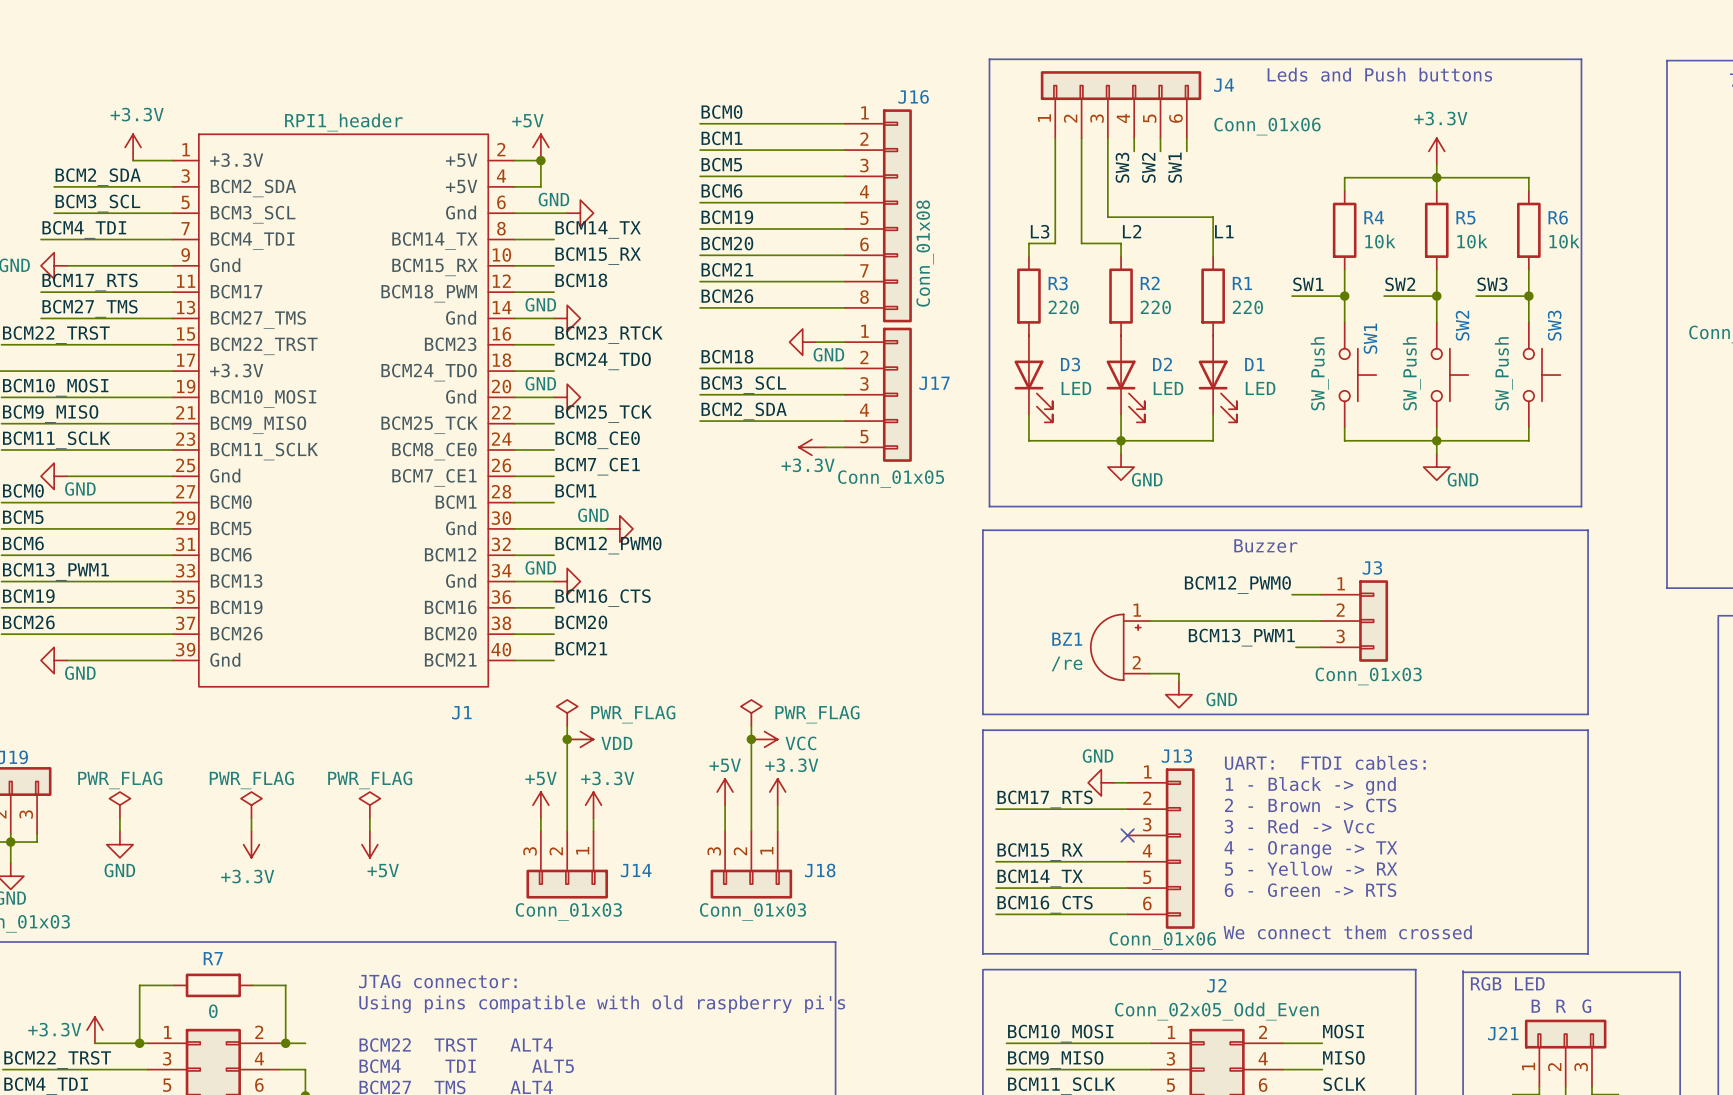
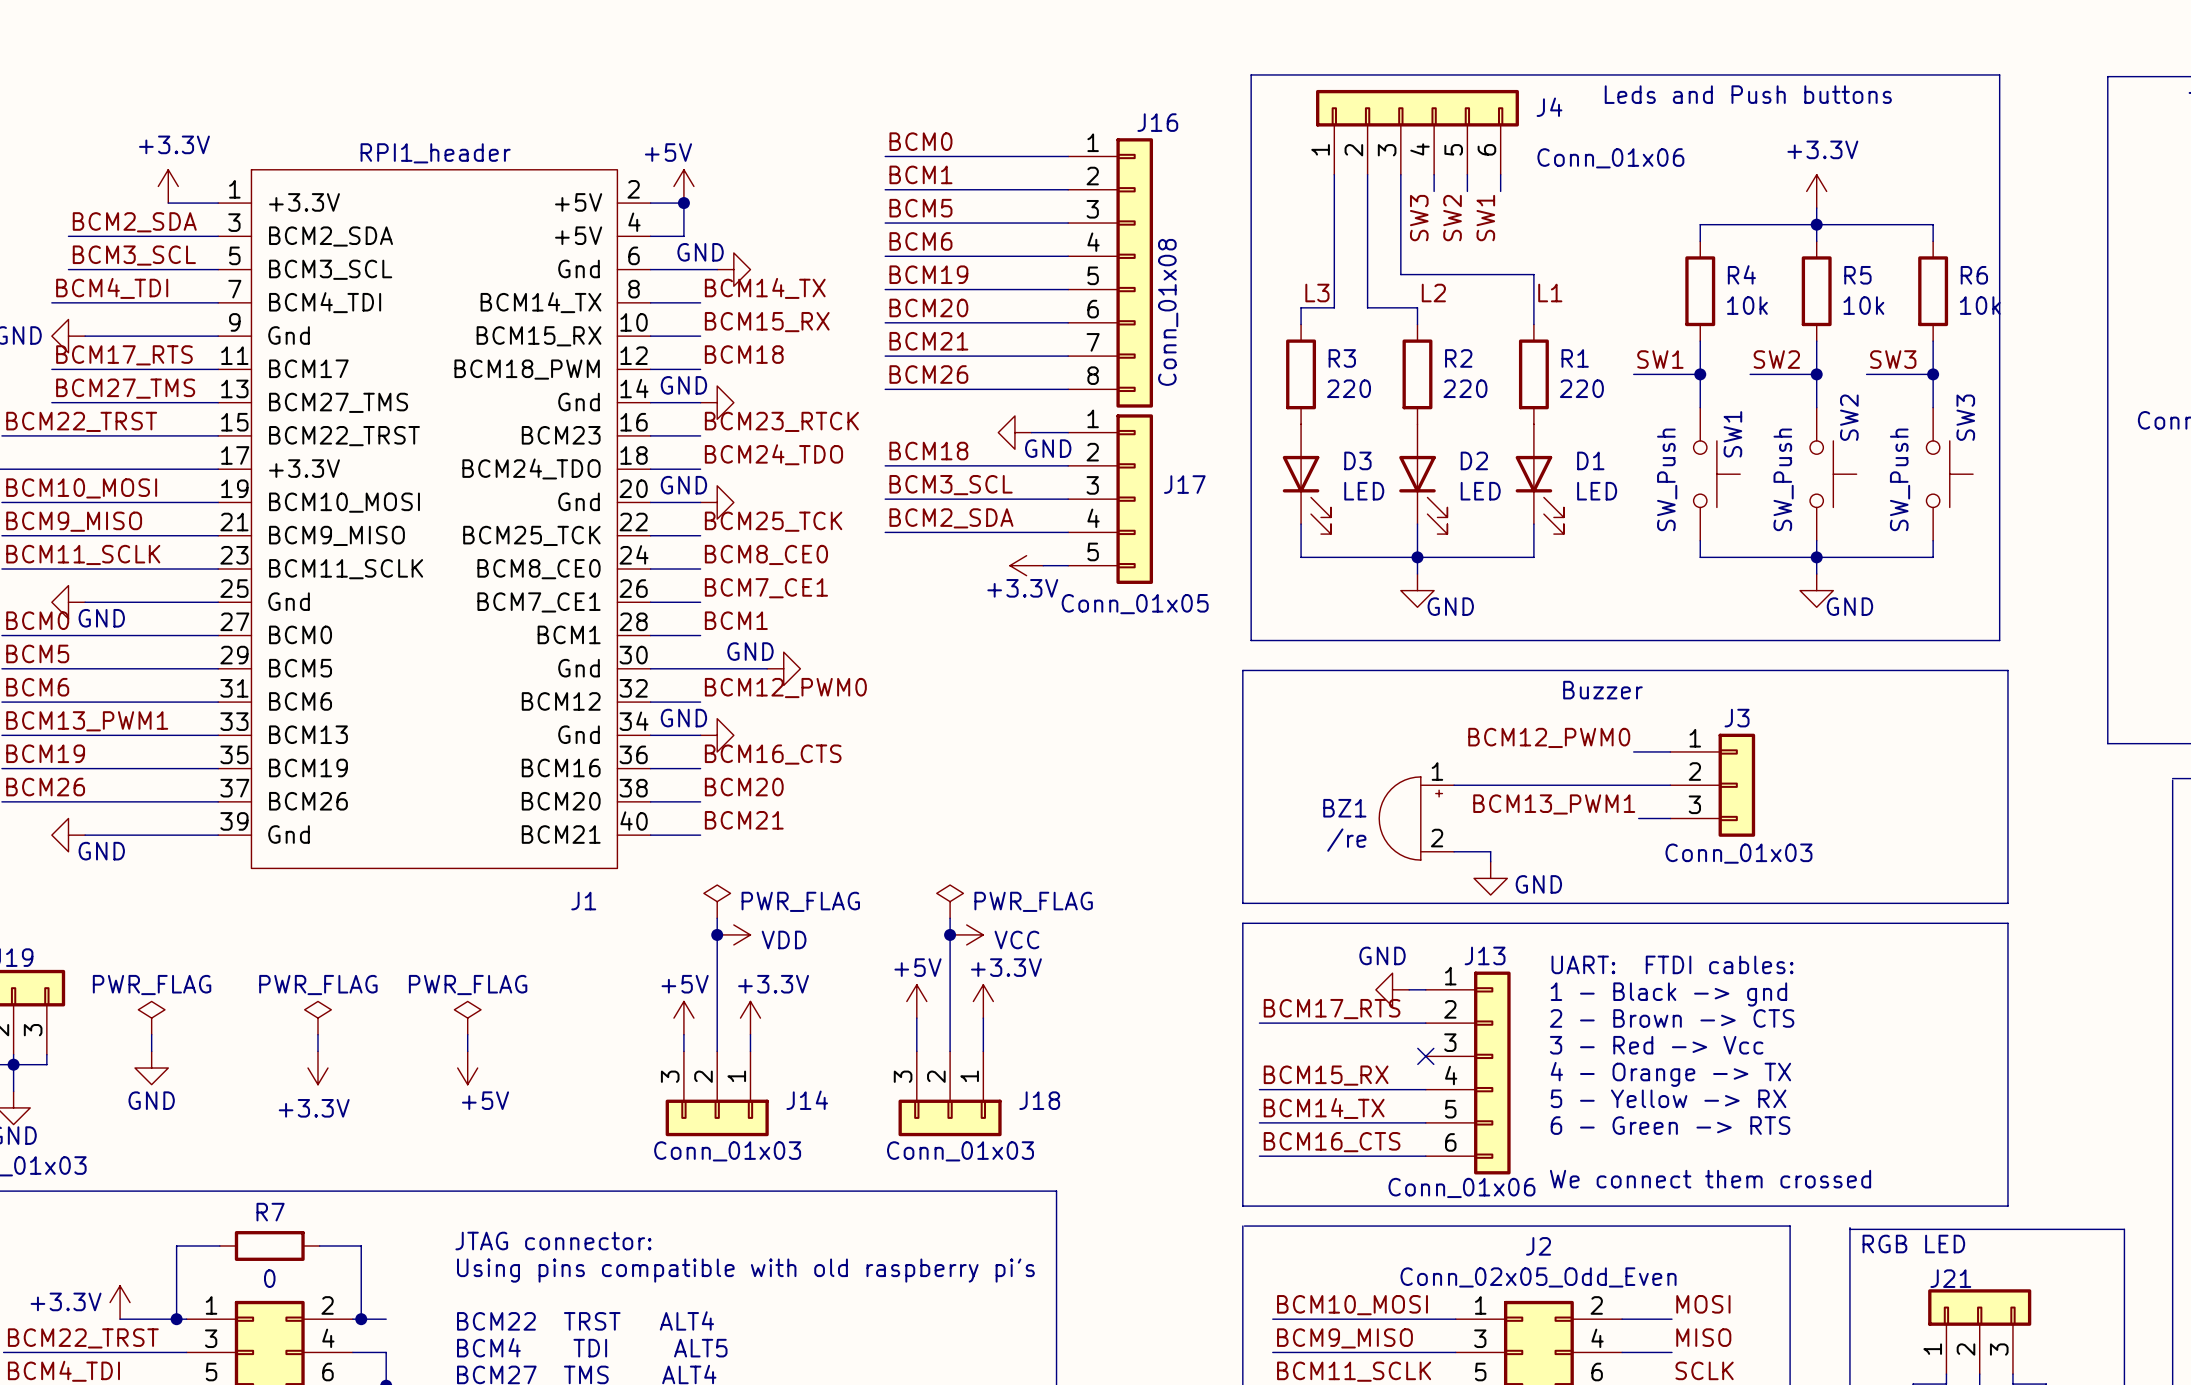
text: B (1535, 1006) -> none
text: R (1561, 1006) -> none
text: G (1586, 1006) -> none
J21 name position: J21 (1503, 1033) -> J21 (1950, 1278)

